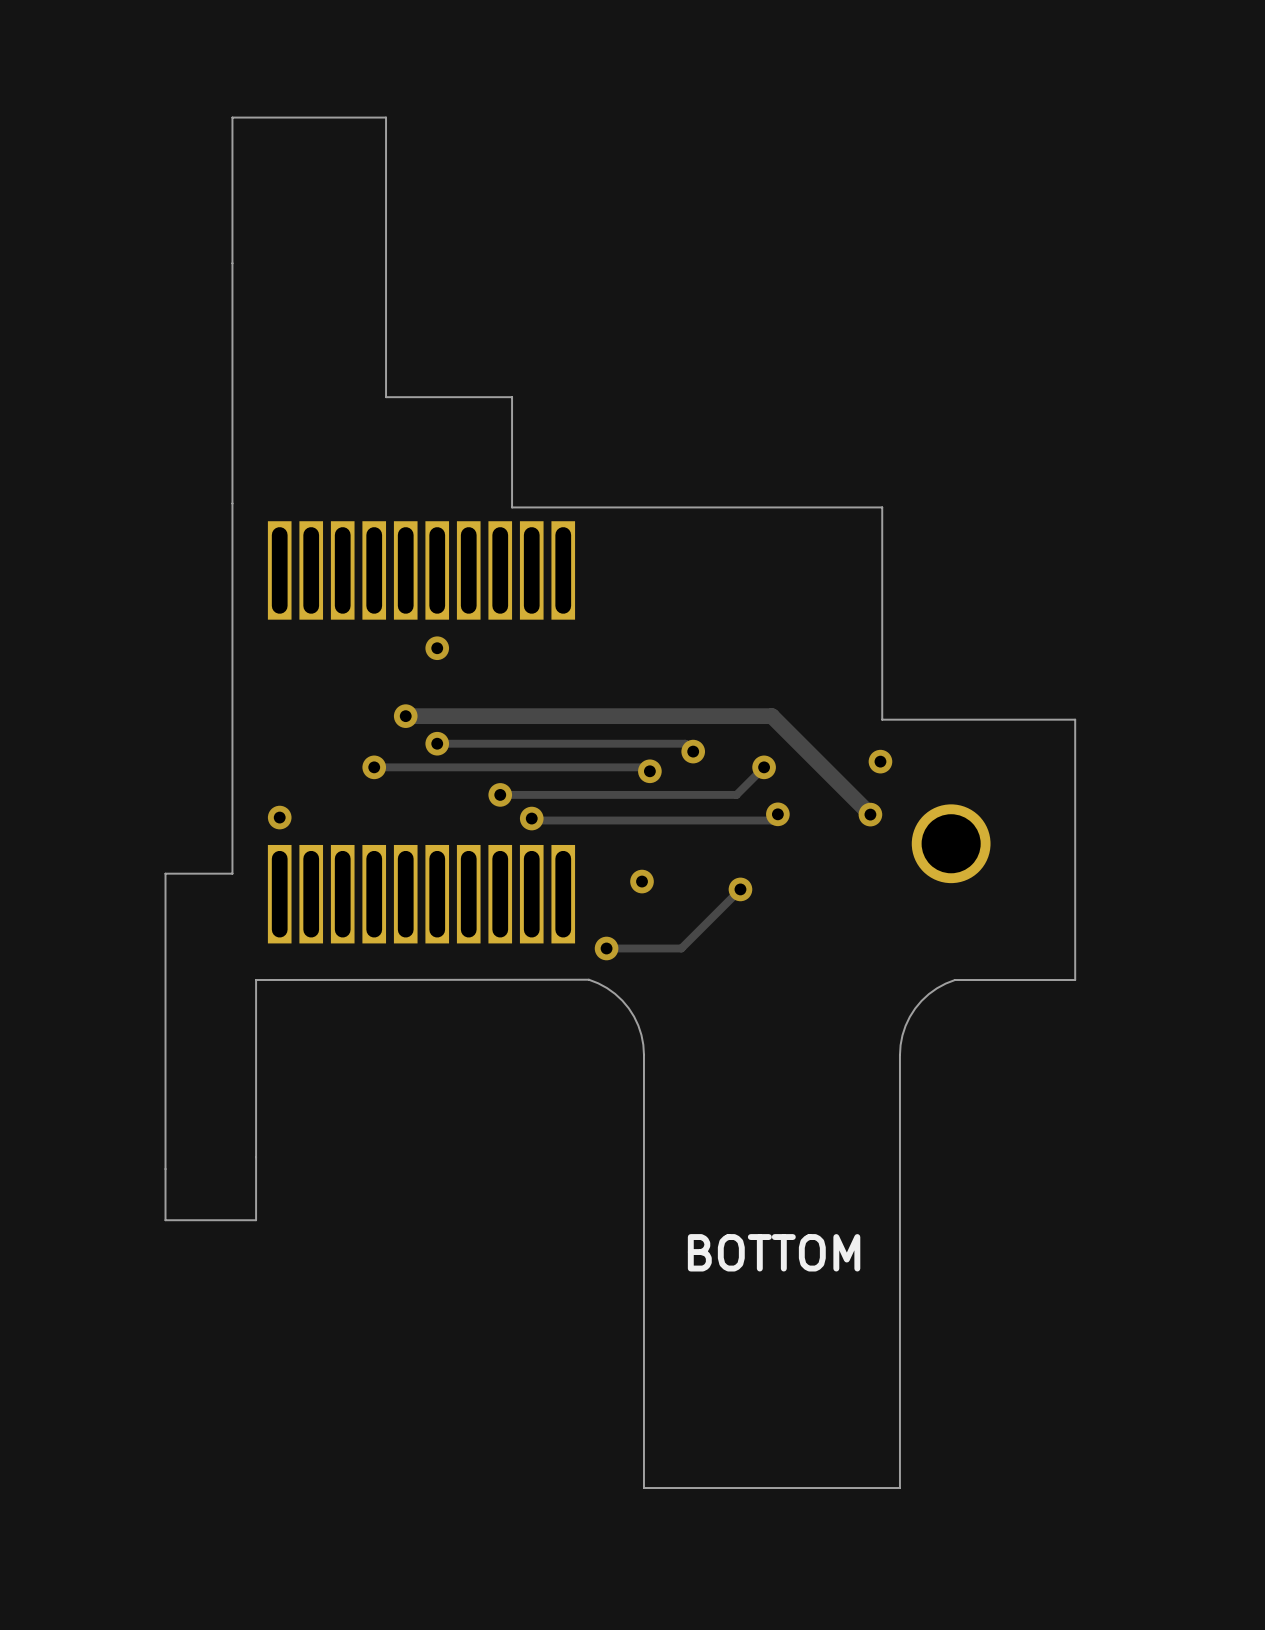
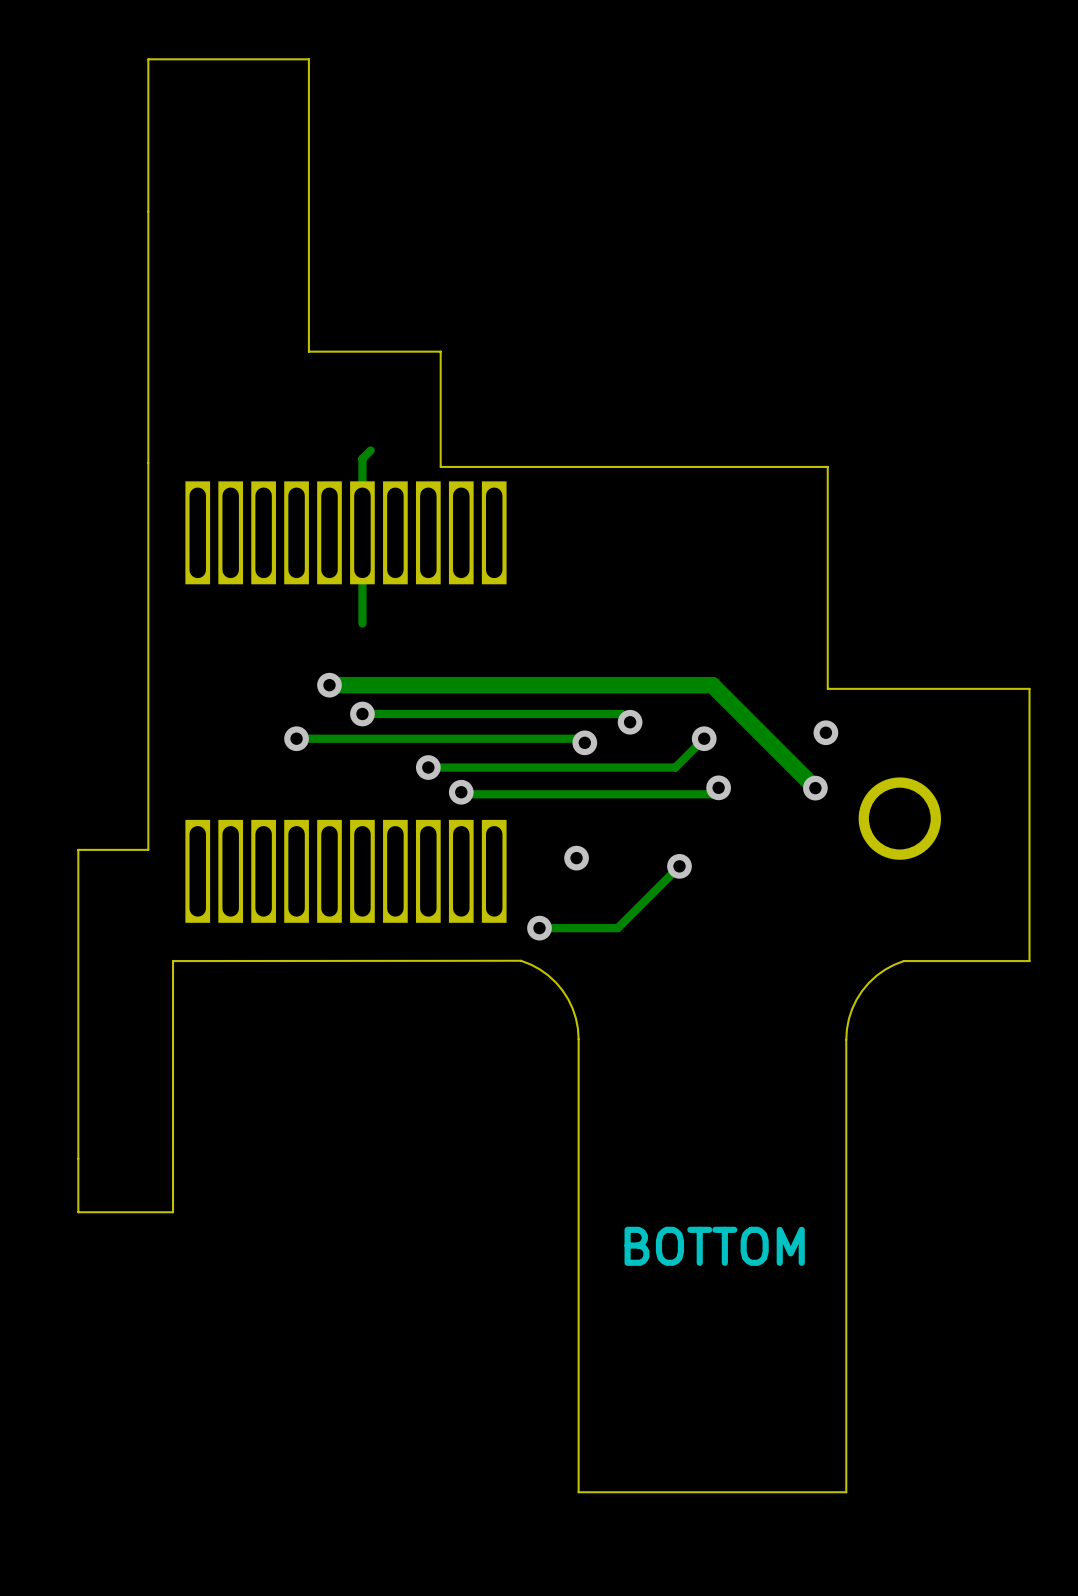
track: none -> (370, 450) (362, 458) (362, 623)
via: (437, 648) -> none
via: (279, 817) -> none

